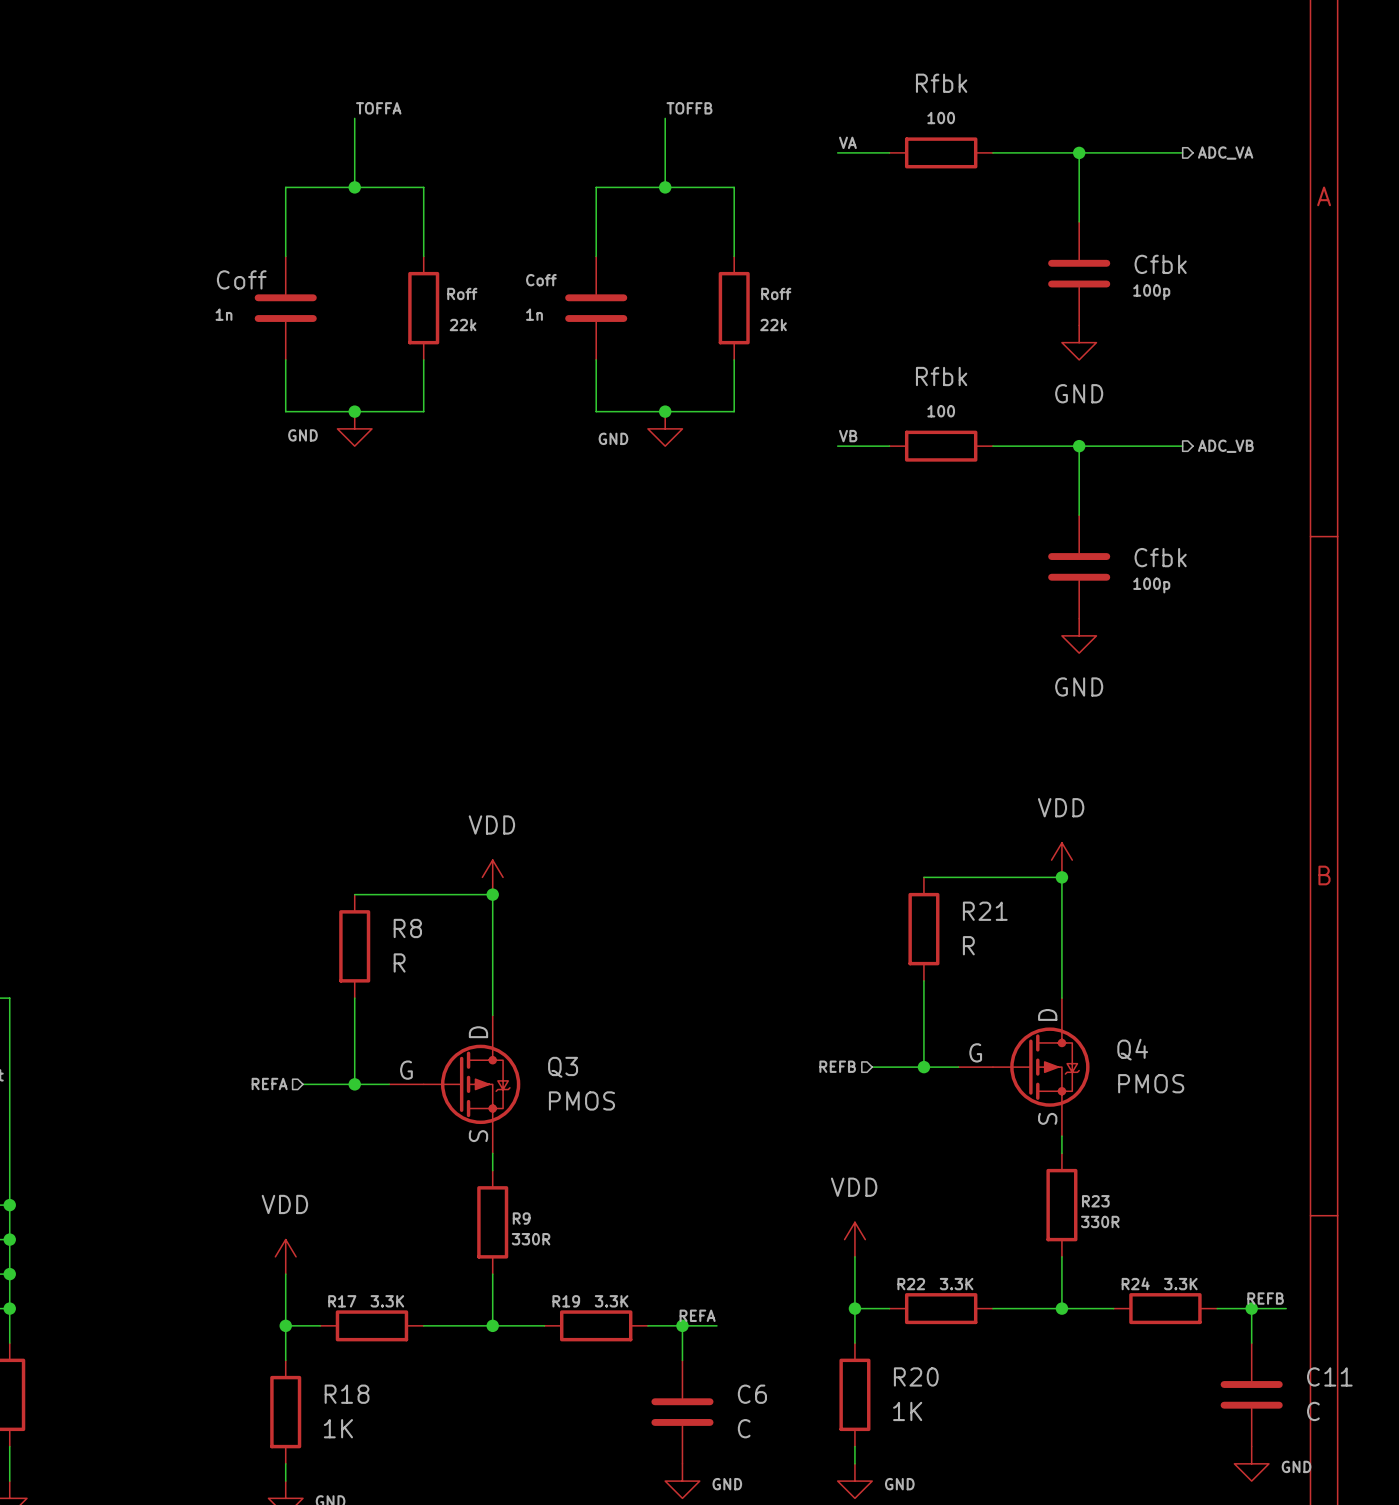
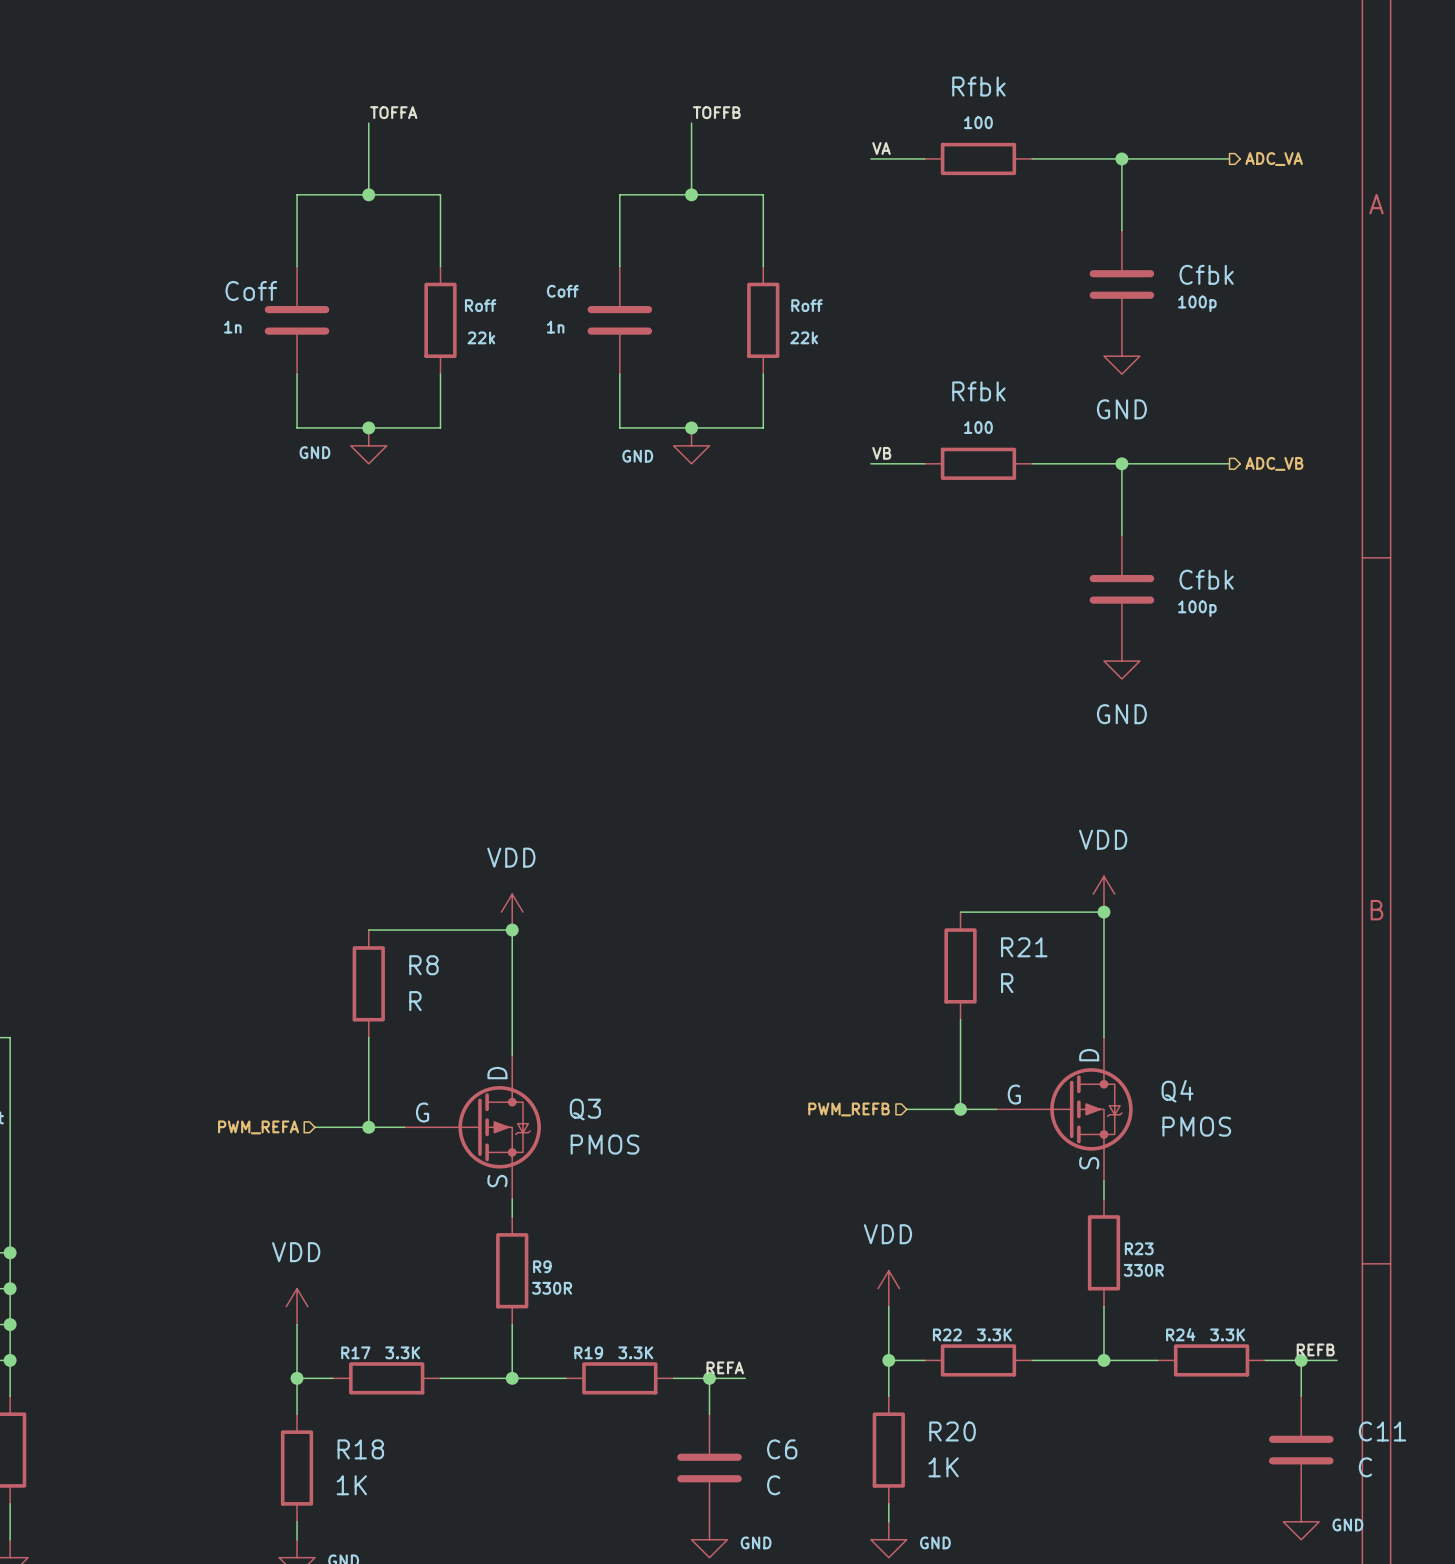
hierarchical label: REFB (837, 1066) -> PWM_REFB (849, 1109)
hierarchical label: REFA (269, 1083) -> PWM_REFA (258, 1127)

